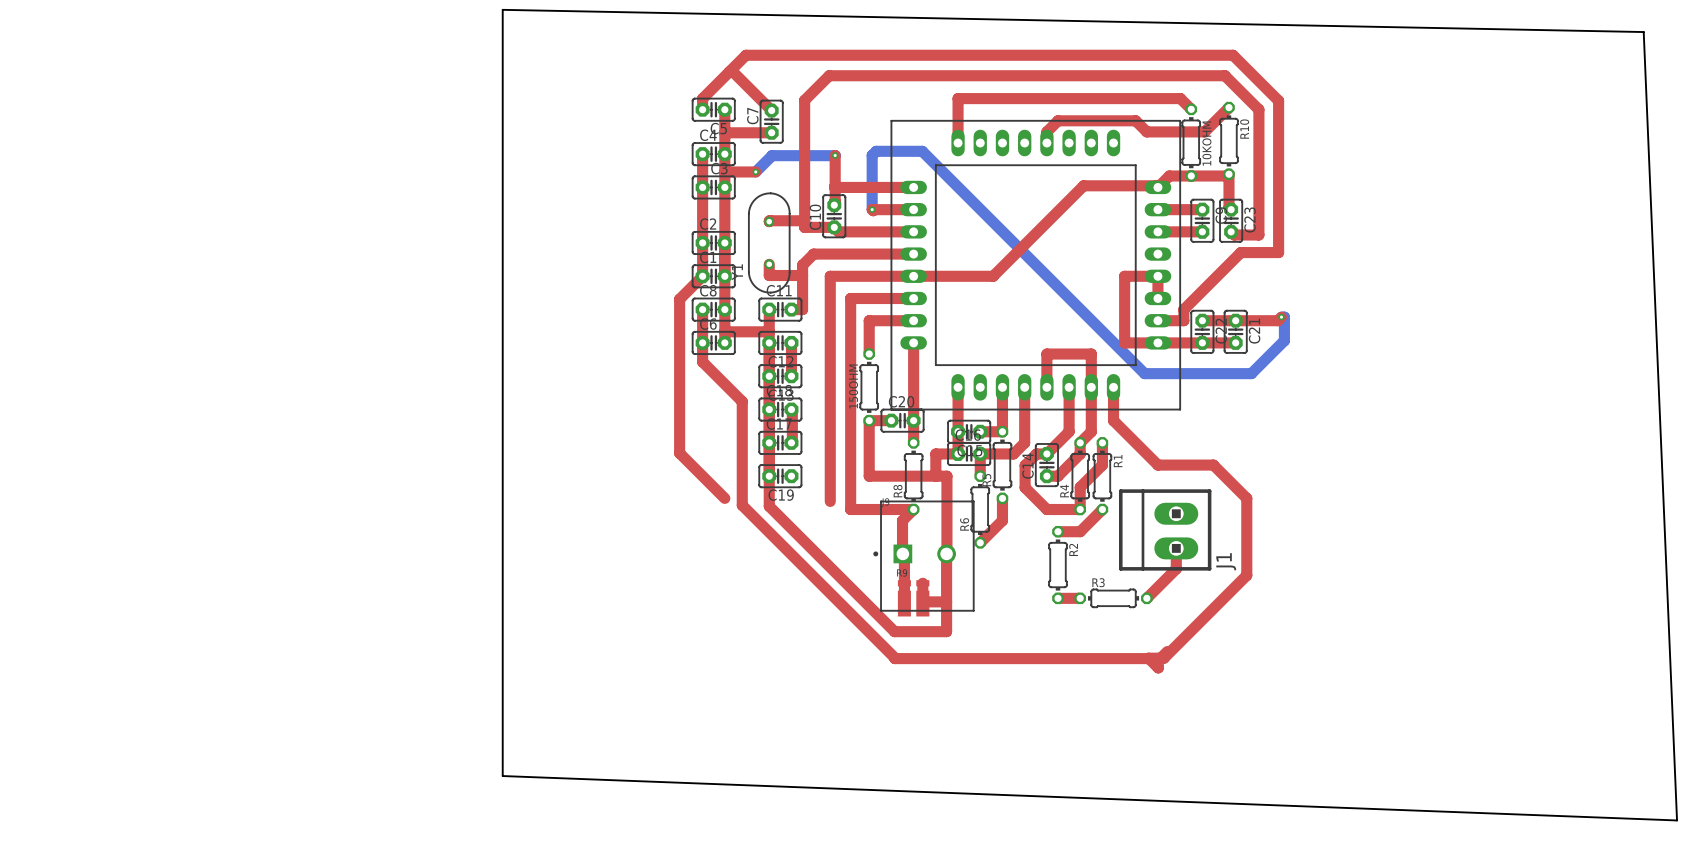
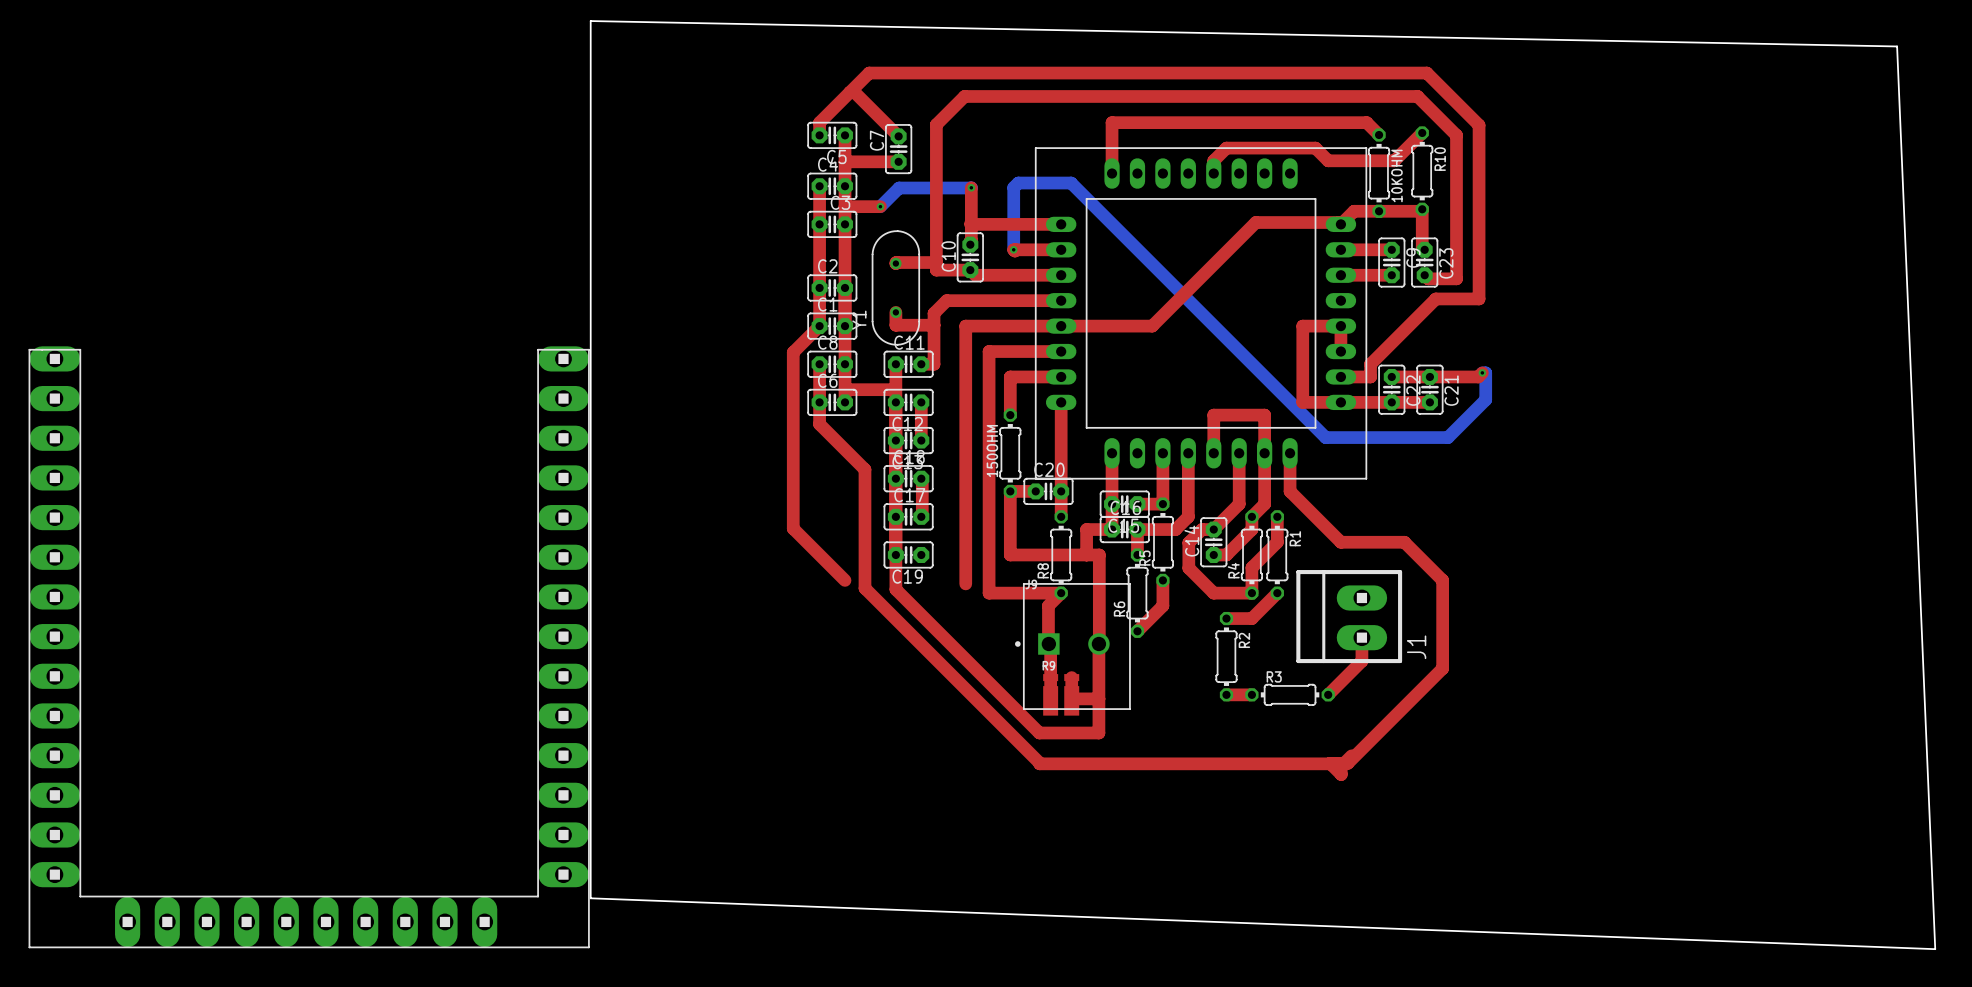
part: none -> (309, 647)

